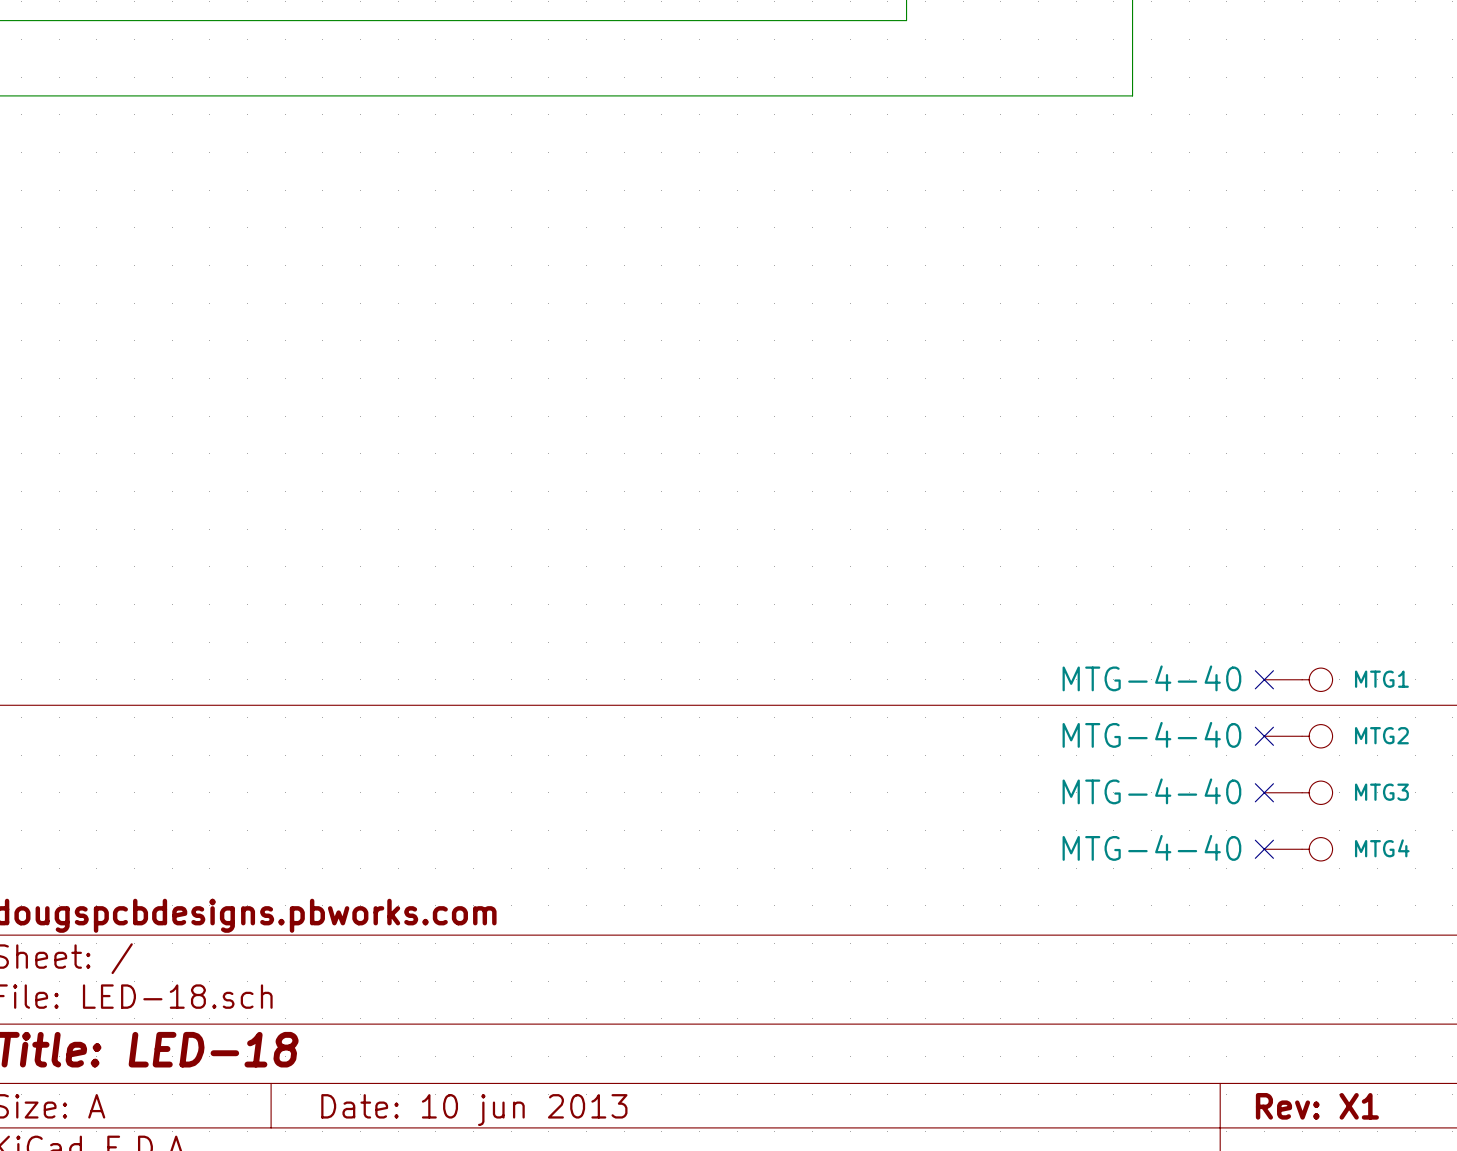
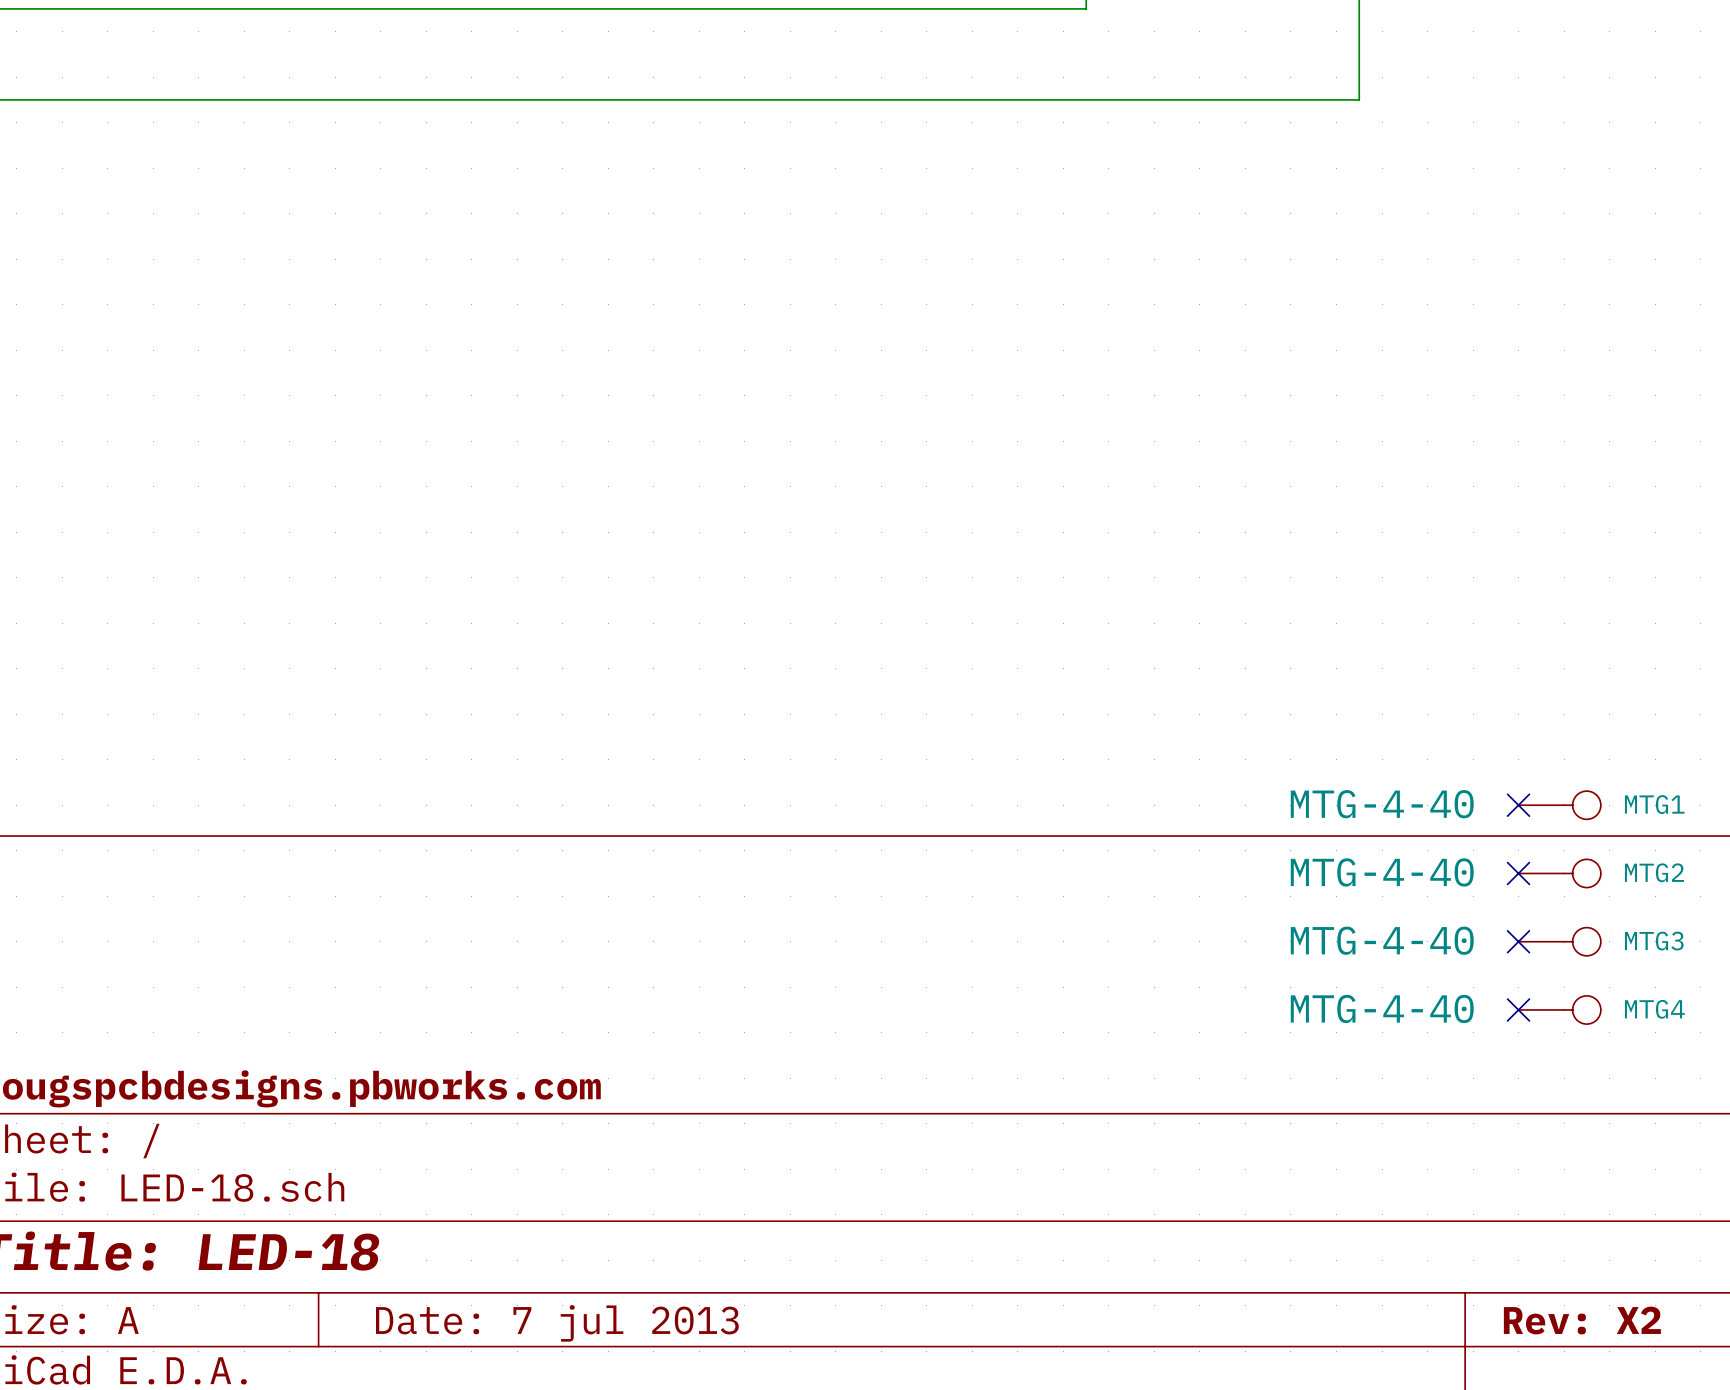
title block: Rev: X1 (1317, 1106) -> Rev: X2 (1582, 1320)
title block: Date: 10 jun 2013 (474, 1110) -> Date: 7 jul 2013 (557, 1323)

